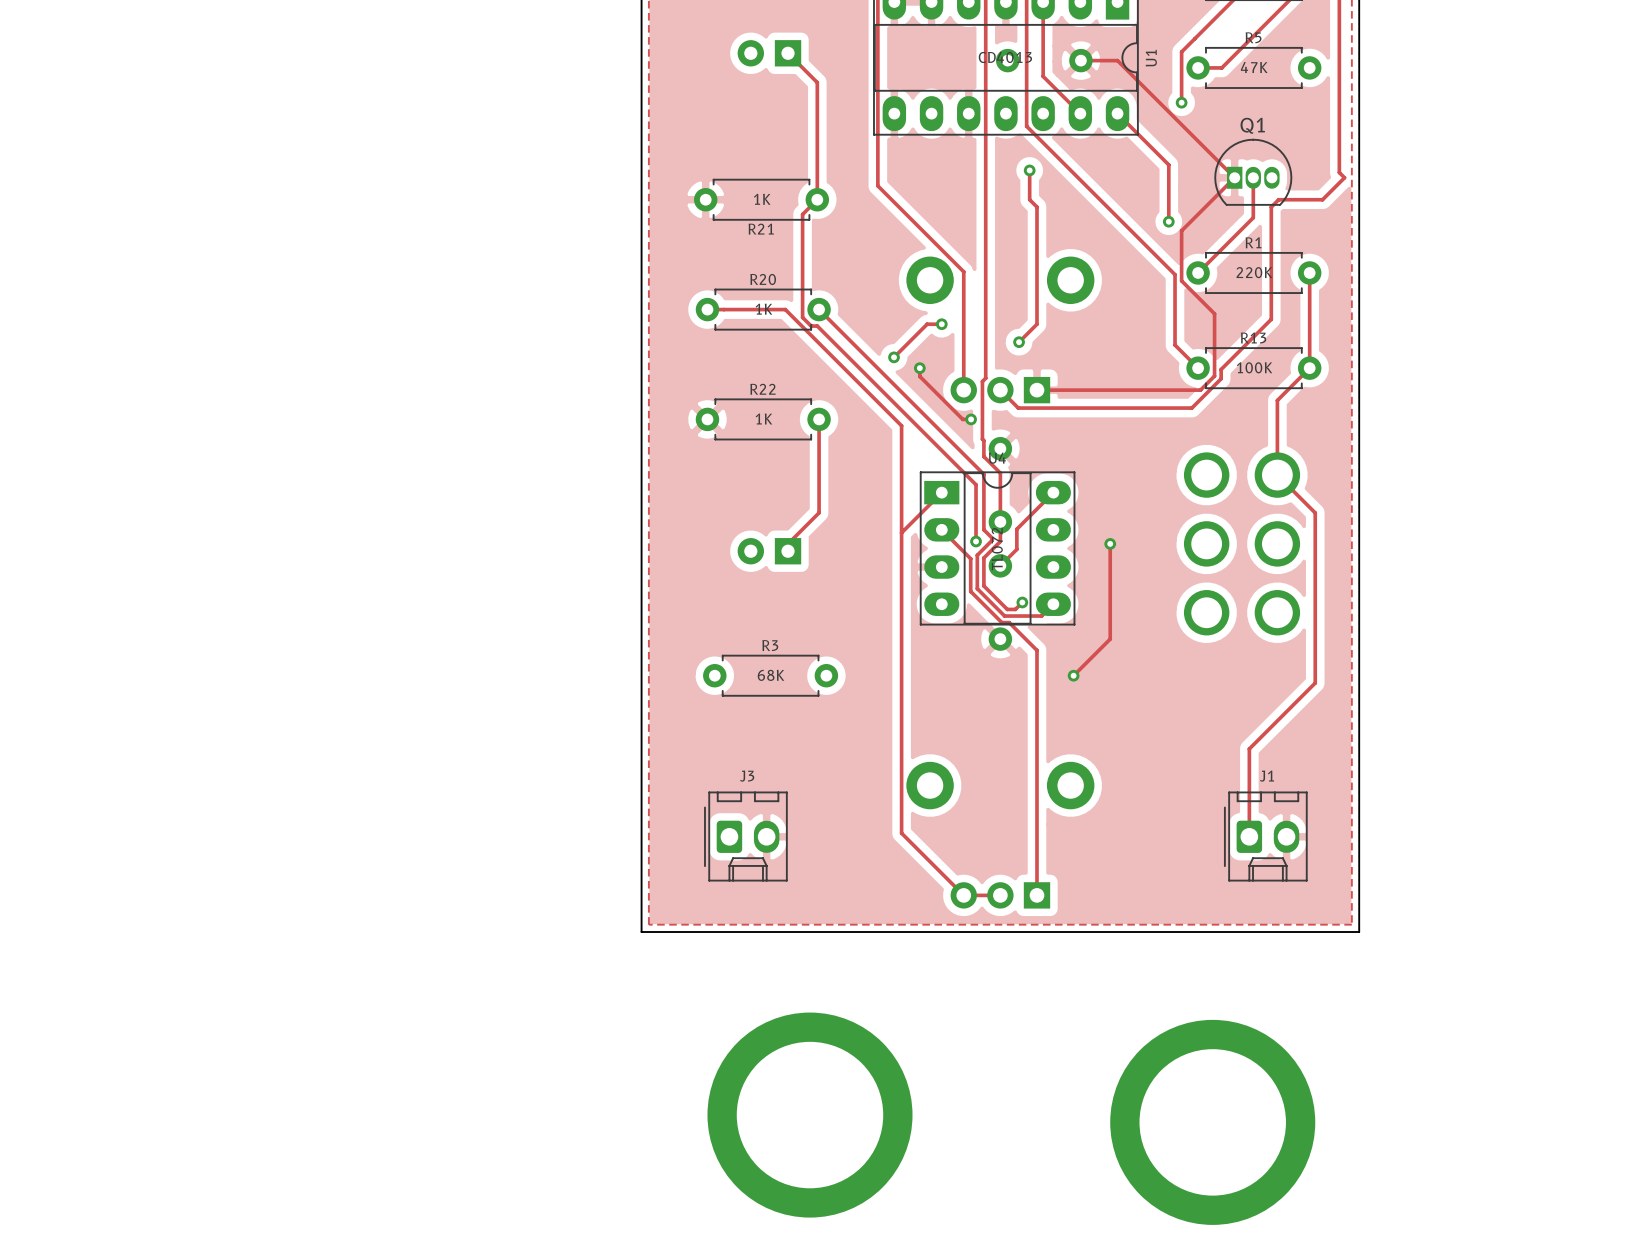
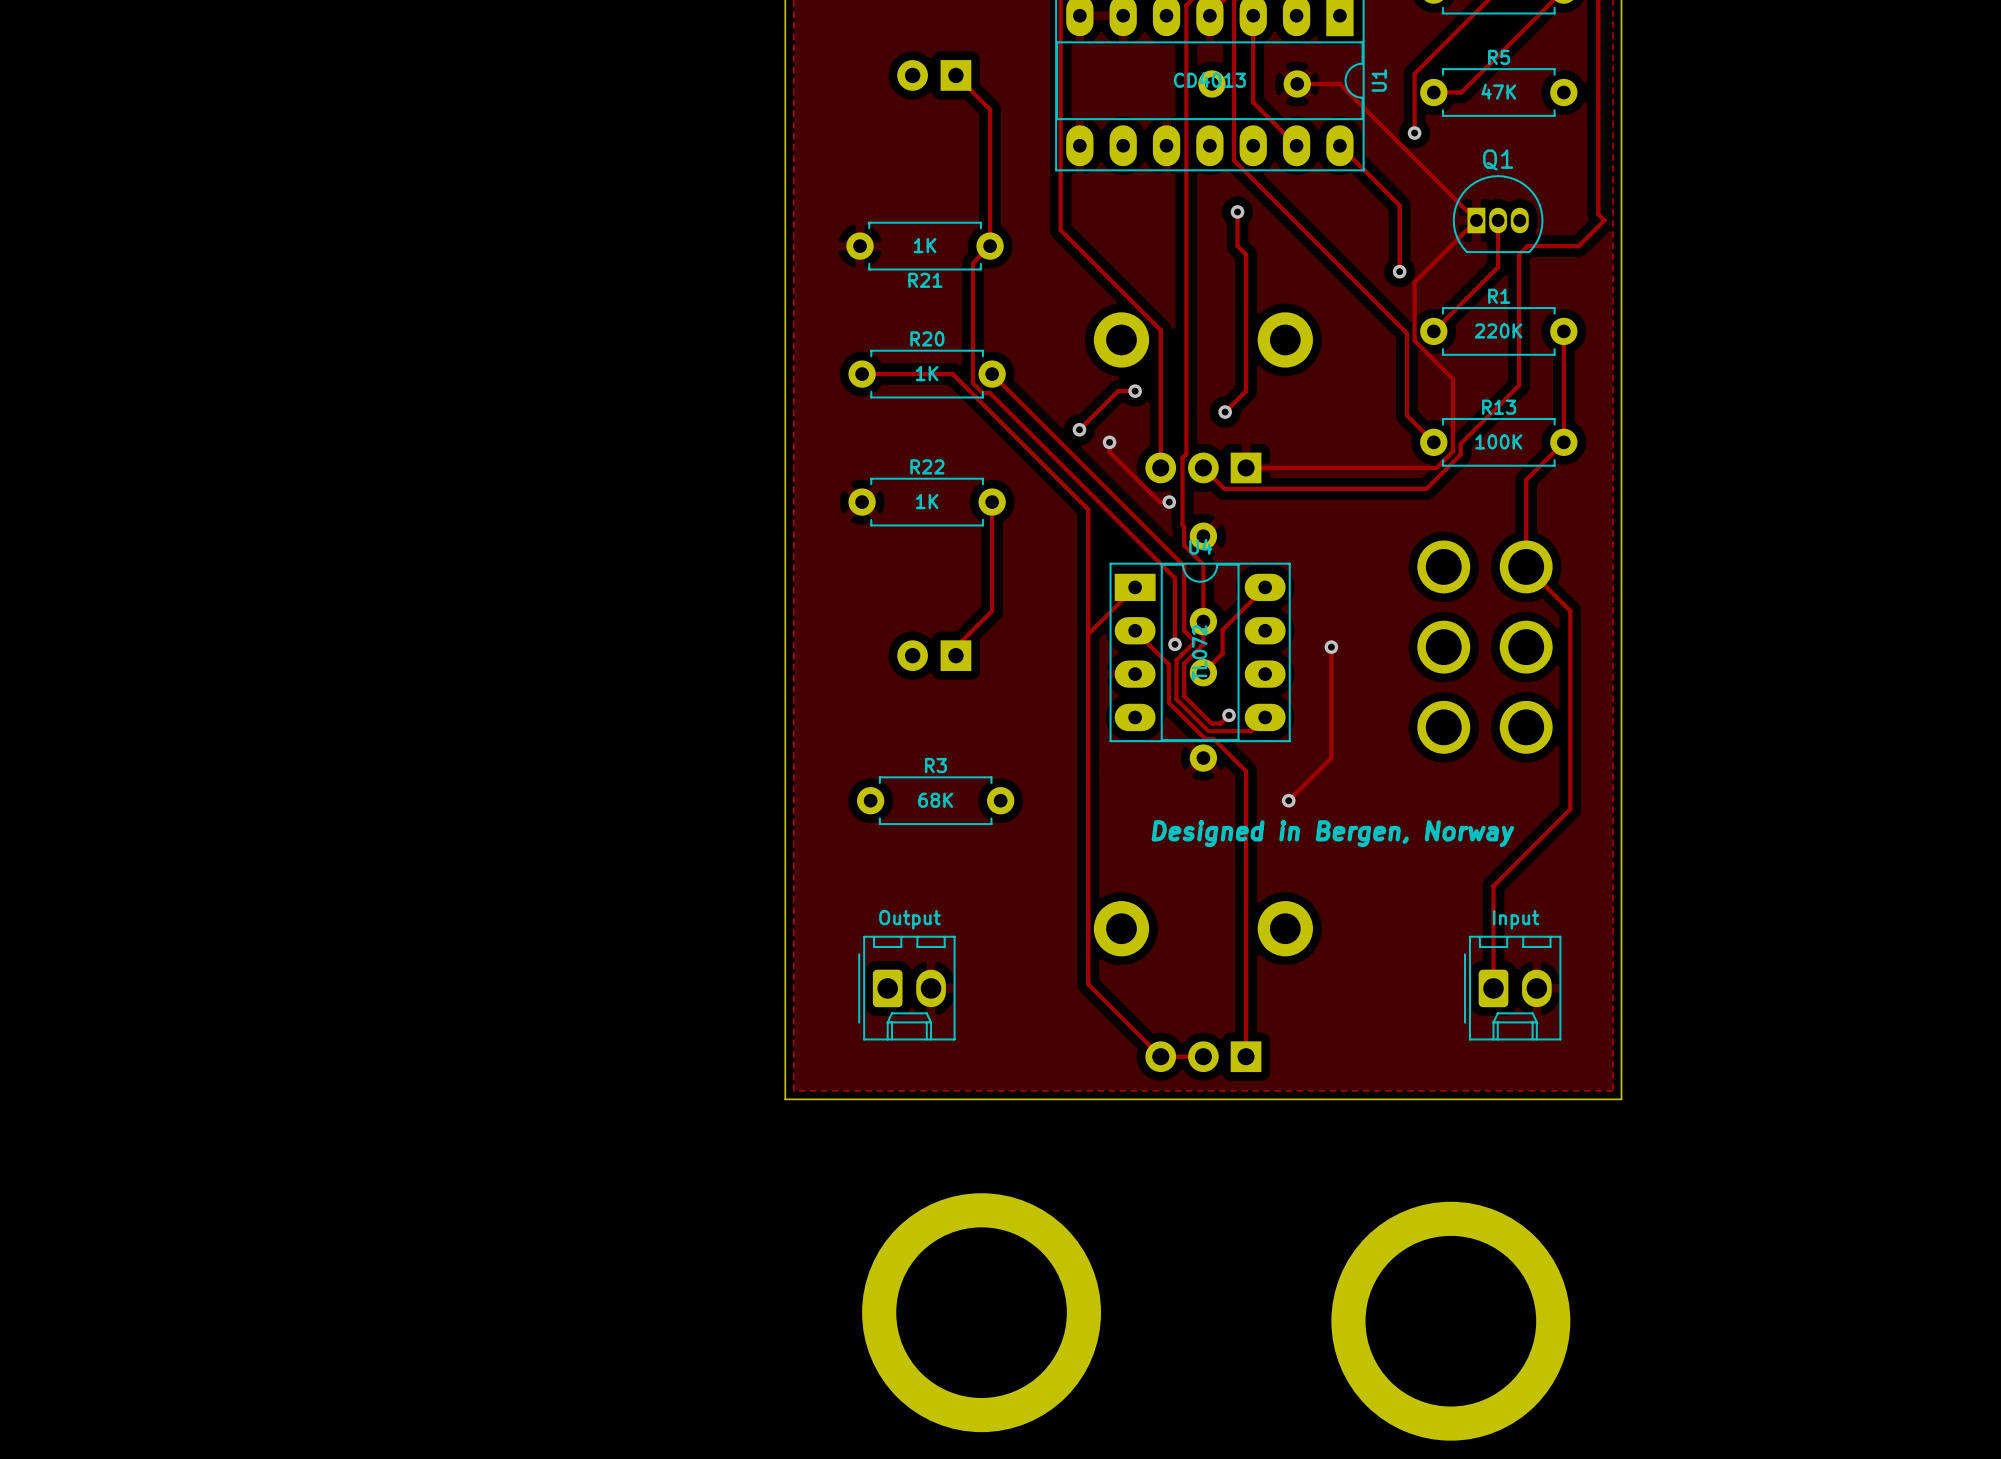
text: none -> Designed in Bergen, Norway (1332, 833)
J3 name: J3 (747, 776) -> Output (909, 919)
J1 name: J1 (1267, 776) -> Input (1516, 919)

